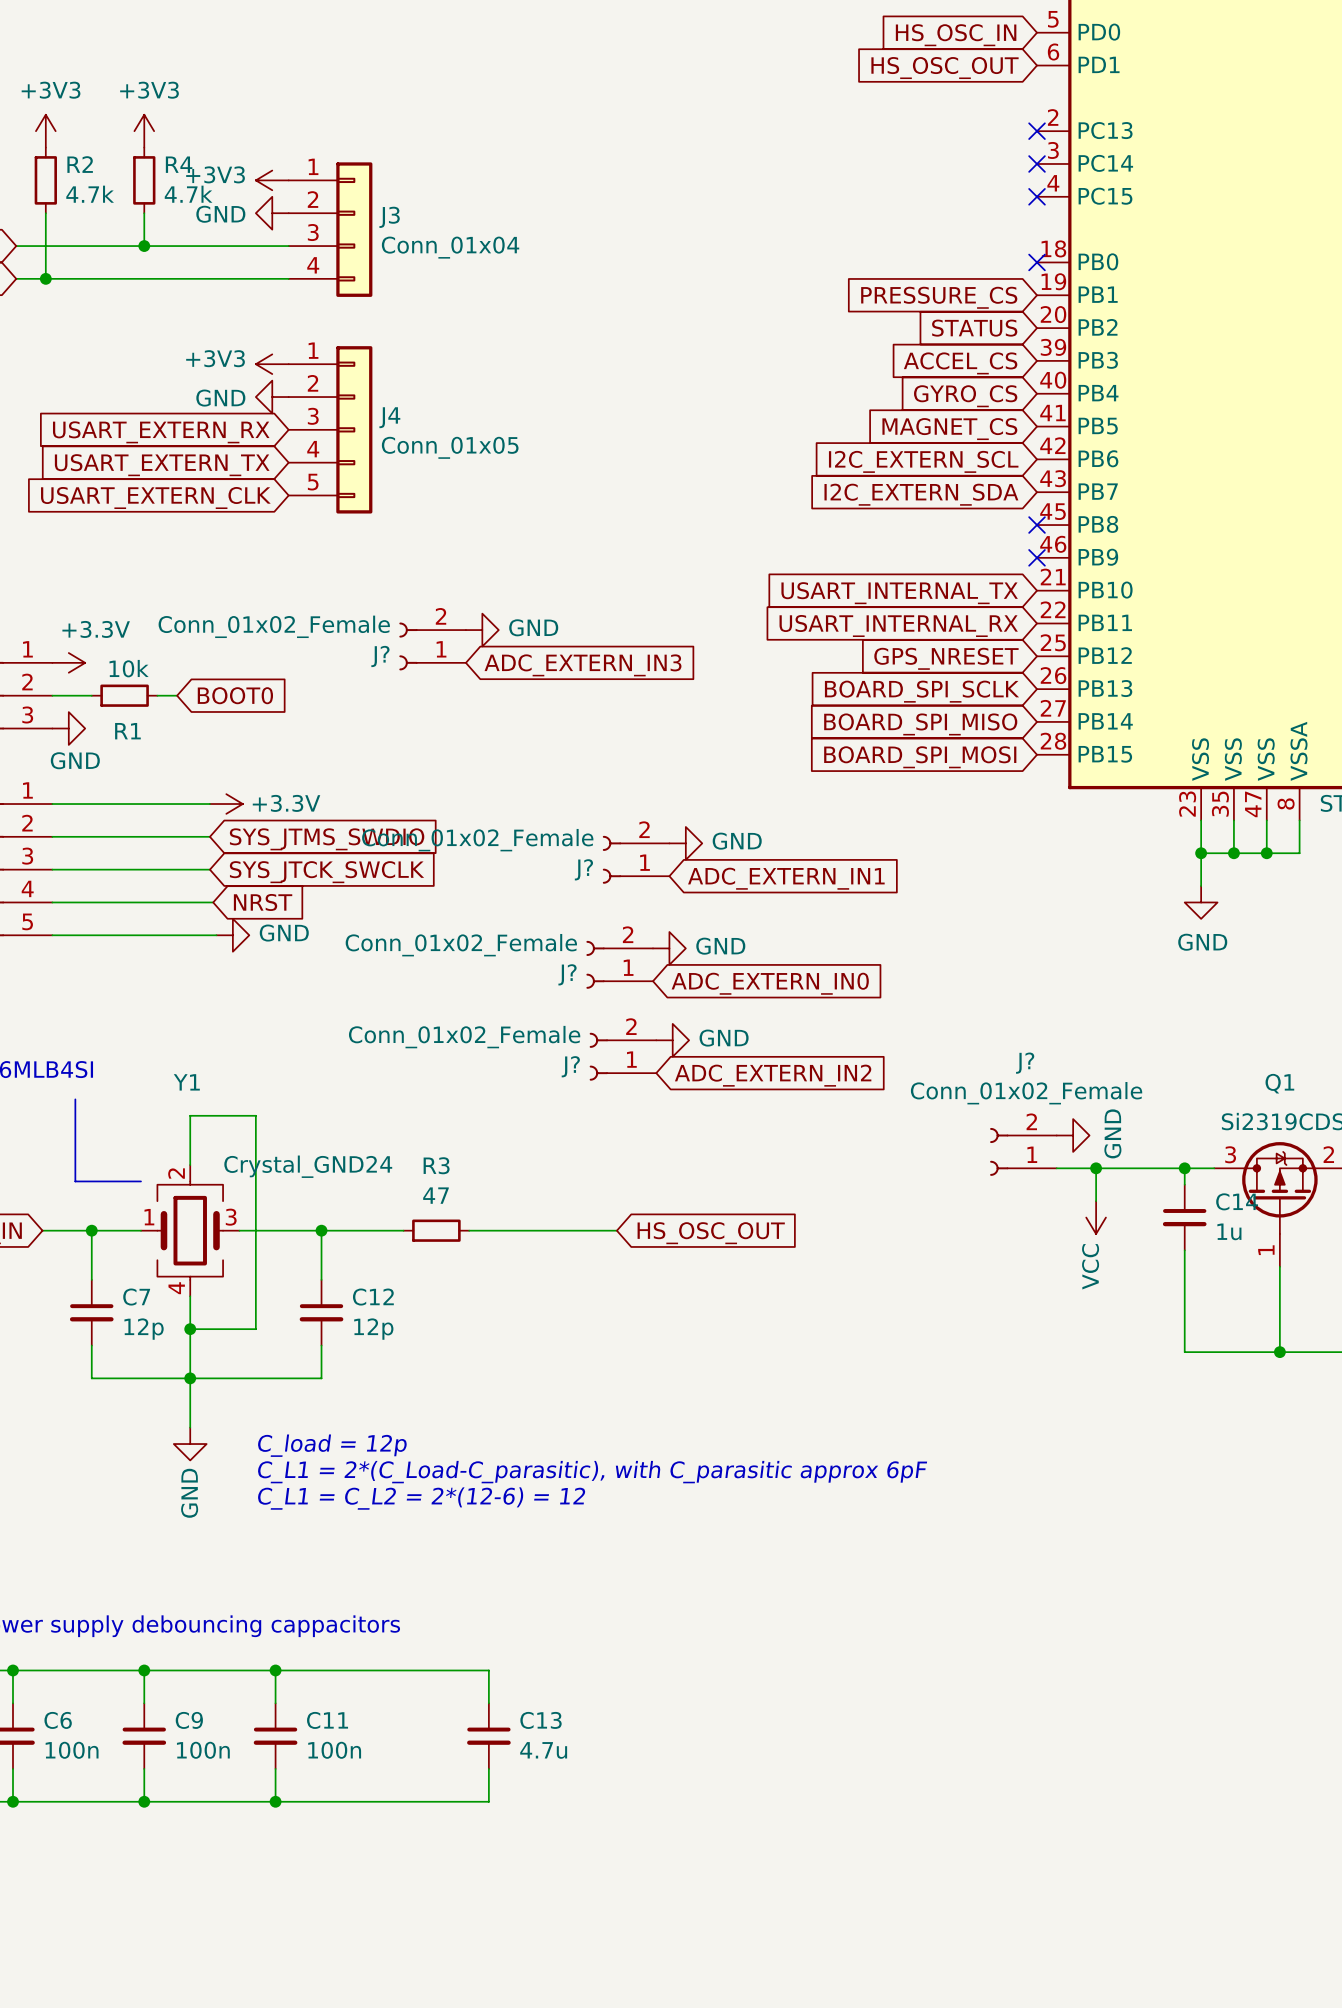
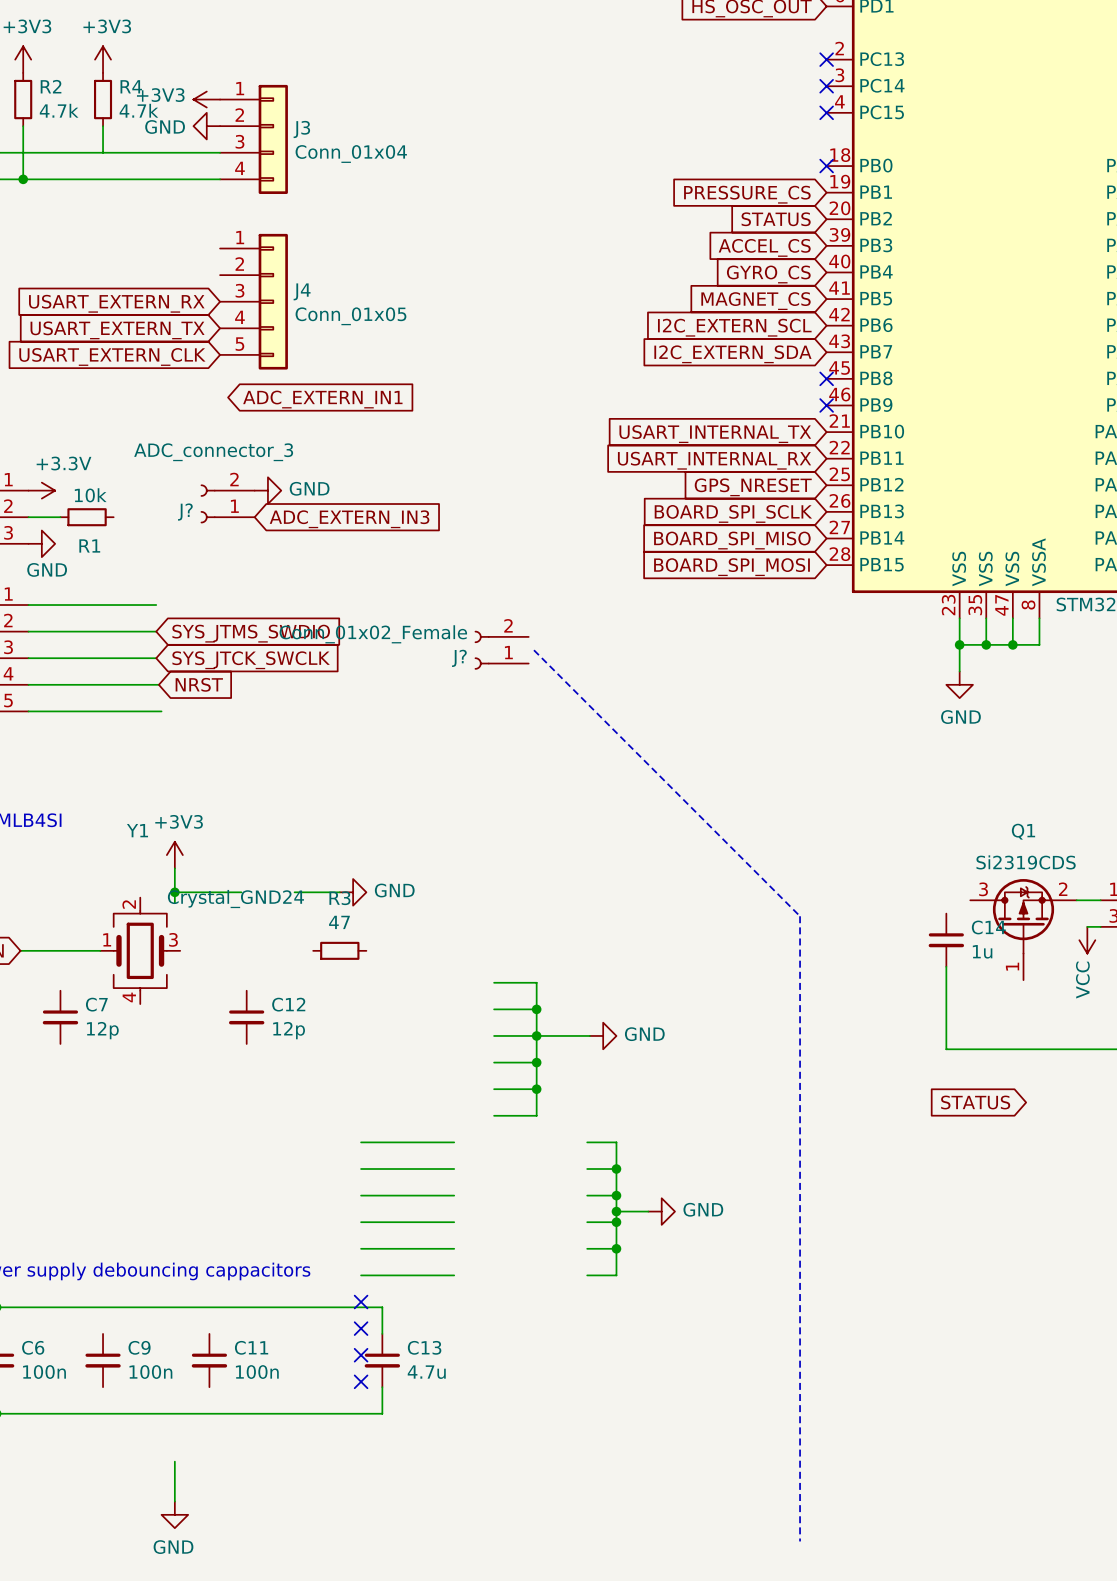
junction: (144, 246) -> none
power symbol: +3V3 (272, 364) -> none
power symbol: GND (272, 397) -> none
global label: none -> ADC_EXTERN_IN1 (322, 399)
power symbol: GND (482, 630) -> none
J?: Conn_01x02_Female (432, 646) -> none
power symbol: none -> GND (267, 490)
global label position: ADC_EXTERN_IN3 (583, 665) -> ADC_EXTERN_IN3 (349, 519)
J?: none -> ADC_connector_3 (227, 503)
wire: (157, 695) (177, 695) -> none
global label: BOOT0 (235, 695) -> none
power symbol: +3.3V (226, 804) -> none
power symbol: GND (685, 843) -> none
line: none -> (534, 650) (800, 916) (800, 1541)
global label: ADC_EXTERN_IN1 (786, 878) -> none
power symbol: GND (232, 935) -> none
power symbol: GND (669, 948) -> none
J?: Conn_01x02_Female (619, 964) -> none
global label: ADC_EXTERN_IN0 (770, 983) -> none
power symbol: GND (672, 1040) -> none
J?: Conn_01x02_Female (622, 1056) -> none
global label: ADC_EXTERN_IN2 (773, 1075) -> none
line: (75, 1099) (75, 1181) (141, 1181) -> none
power symbol: none -> +3V3 (174, 855)
wire: none -> (174, 868) (174, 902)
power symbol: GND (1073, 1135) -> none
J?: Conn_01x02_Female (1023, 1151) -> none
wire: none -> (174, 892) (241, 892)
junction: none -> (174, 892)
wire: none -> (294, 892) (339, 892)
power symbol: none -> GND (353, 892)
wire: (190, 1165) (190, 1115) (255, 1115) (255, 1329) (190, 1329) -> none
wire: (1056, 1168) (1214, 1168) -> none
wire: (1096, 1168) (1096, 1201) -> none
junction: (1096, 1168) -> none
wire: (1184, 1168) (1184, 1184) -> none
junction: (1184, 1168) -> none
power symbol: VCC (1096, 1217) -> none
wire: (91, 1230) (91, 1279) -> none
junction: (91, 1230) -> none
wire: (239, 1230) (403, 1230) -> none
wire: (321, 1230) (321, 1279) -> none
junction: (321, 1230) -> none
wire: (469, 1230) (616, 1230) -> none
global label: HS_OSC_OUT (711, 1233) -> none
wire: (1279, 1266) (1279, 1352) -> none
wire: none -> (494, 982) (536, 982) (536, 1115) (494, 1115)
wire: (190, 1296) (190, 1427) -> none
wire: none -> (494, 1009) (536, 1009)
junction: none -> (536, 1009)
junction: (190, 1329) -> none
wire: none -> (494, 1035) (589, 1035)
junction: none -> (536, 1035)
power symbol: none -> GND (603, 1035)
wire: (91, 1345) (91, 1378) (321, 1378) (321, 1345) -> none
junction: (1279, 1352) -> none
wire: none -> (494, 1062) (536, 1062)
junction: none -> (536, 1062)
junction: (190, 1378) -> none
wire: none -> (494, 1089) (536, 1089)
junction: none -> (536, 1089)
global label: none -> STATUS (975, 1102)
power symbol: GND (190, 1444) -> none
text: C_load = 12p (332, 1445) -> none
wire: none -> (361, 1142) (454, 1142)
wire: none -> (587, 1142) (616, 1142) (616, 1275) (587, 1275)
text: C_L1 = 2*(C_Load-C_parasitic), with C_parasitic approx 6pF (592, 1472) -> none
text: C_L1 = C_L2 = 2*(12-6) = 12 (421, 1498) -> none
wire: none -> (361, 1169) (454, 1169)
wire: none -> (587, 1169) (616, 1169)
junction: none -> (616, 1169)
wire: none -> (361, 1195) (454, 1195)
wire: none -> (587, 1195) (616, 1195)
junction: none -> (616, 1195)
wire: none -> (616, 1211) (648, 1211)
junction: none -> (616, 1211)
power symbol: none -> GND (661, 1211)
wire: none -> (361, 1222) (454, 1222)
wire: none -> (587, 1222) (616, 1222)
junction: none -> (616, 1222)
wire: none -> (361, 1248) (454, 1248)
wire: none -> (587, 1248) (616, 1248)
junction: none -> (616, 1248)
wire: none -> (361, 1275) (454, 1275)
no-connect mark: none -> (361, 1302)
wire: (144, 1670) (144, 1703) -> none
junction: (144, 1670) -> none
wire: (275, 1670) (275, 1703) -> none
junction: (275, 1670) -> none
no-connect mark: none -> (361, 1328)
no-connect mark: none -> (361, 1355)
no-connect mark: none -> (361, 1381)
wire: (144, 1768) (144, 1801) -> none
wire: (275, 1768) (275, 1801) -> none
junction: (144, 1801) -> none
junction: (275, 1801) -> none
wire: none -> (174, 1461) (174, 1501)
power symbol: none -> GND (174, 1514)

